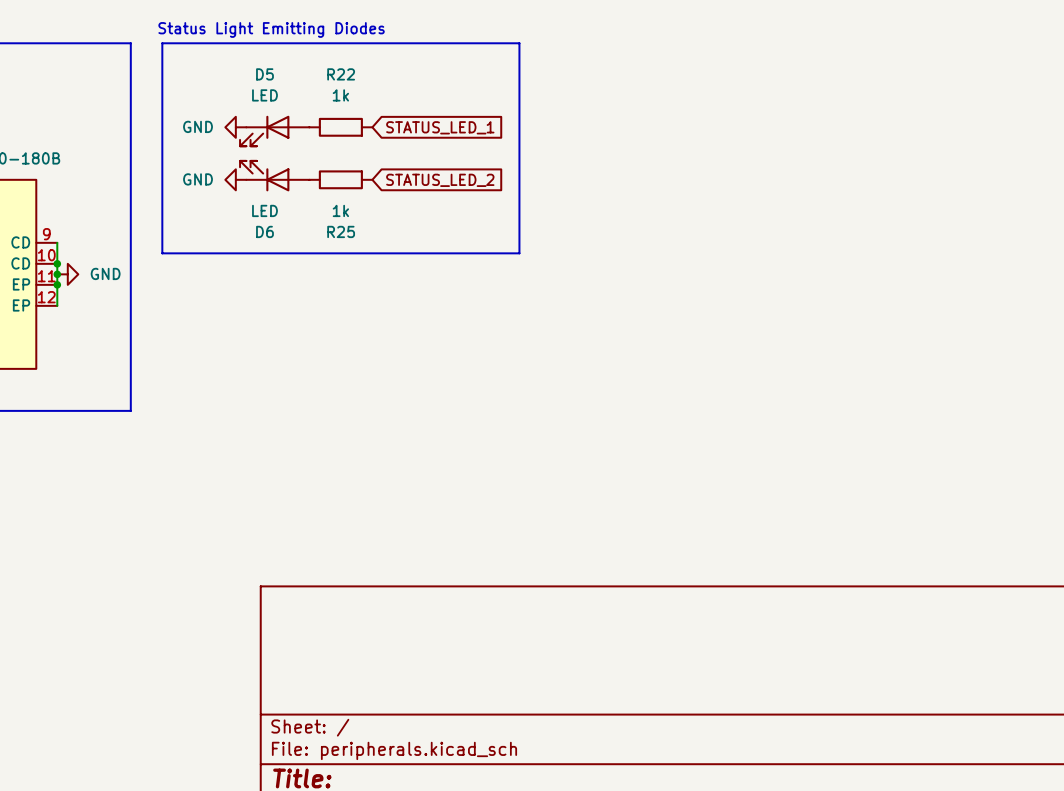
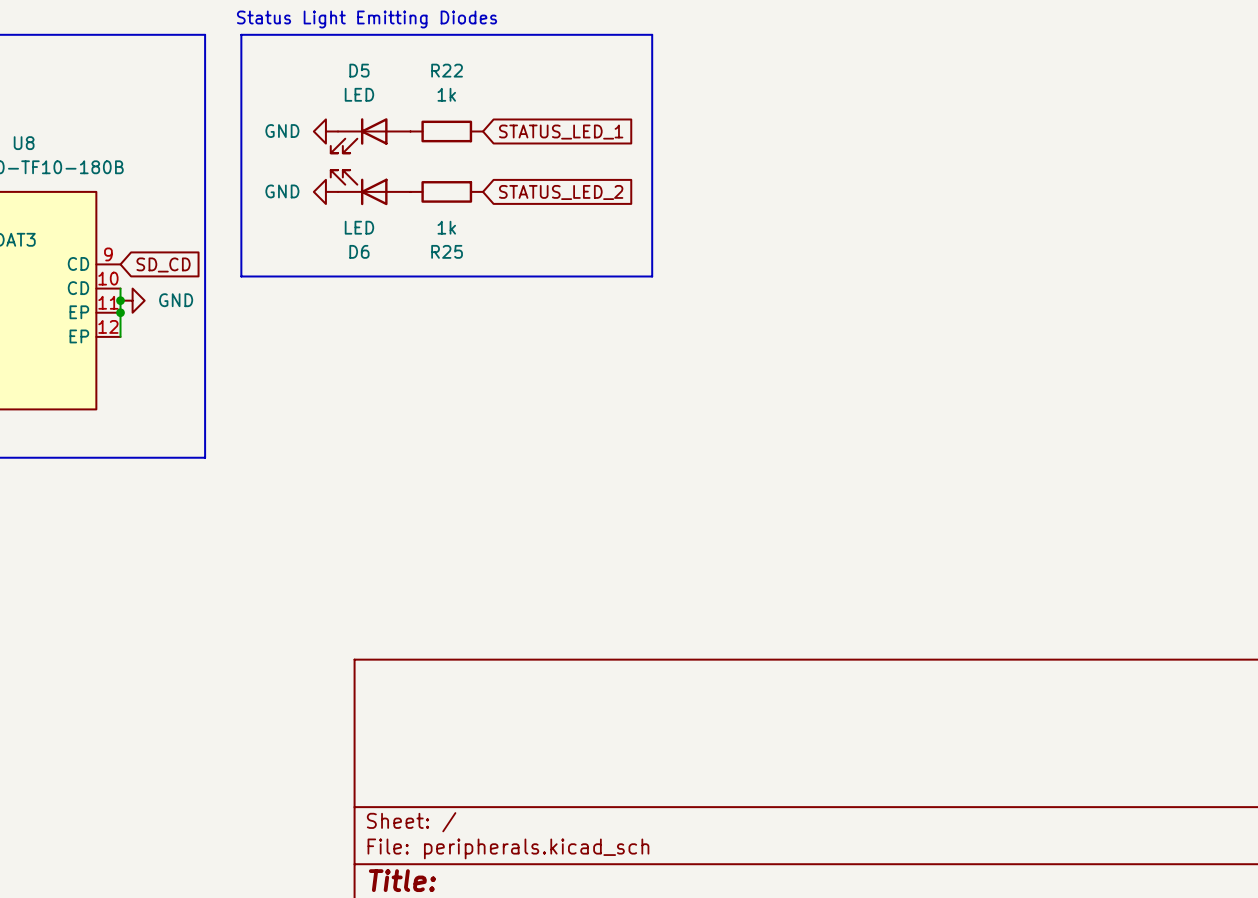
wire: (57, 242) (57, 263) -> none
global label: none -> SD_CD (163, 264)
junction: (57, 263) -> none

